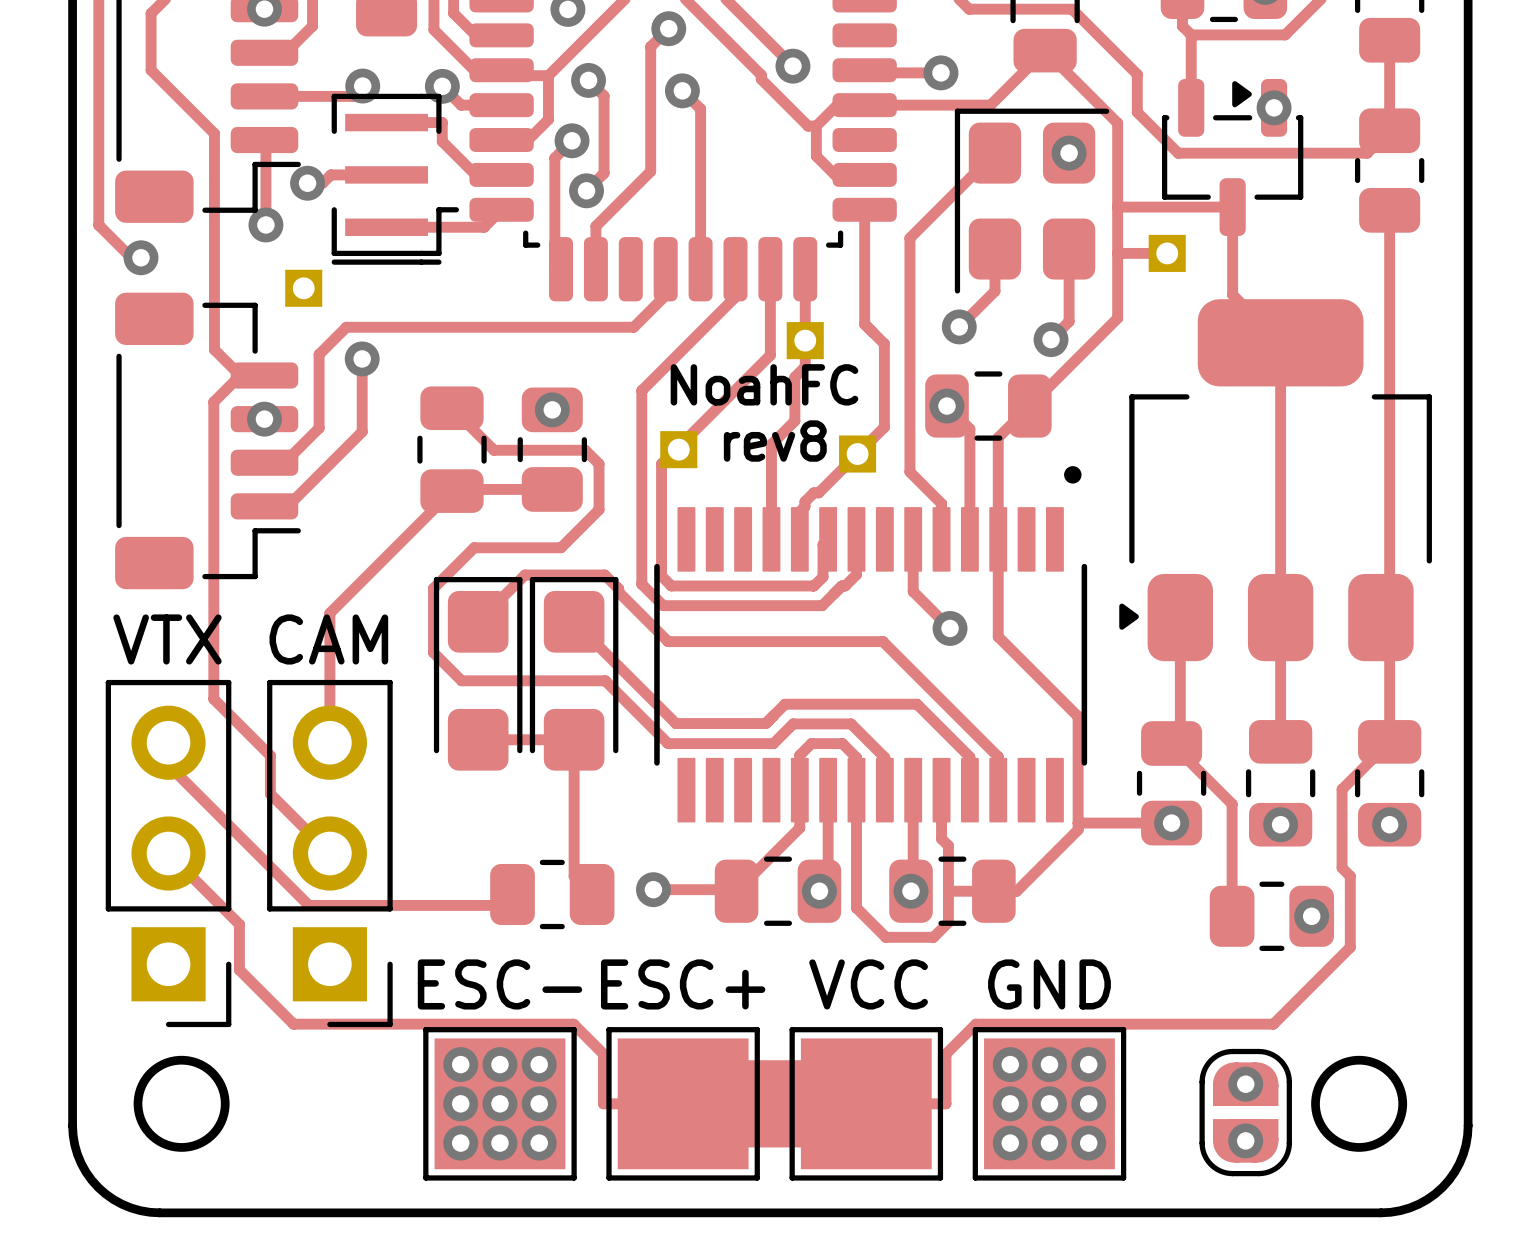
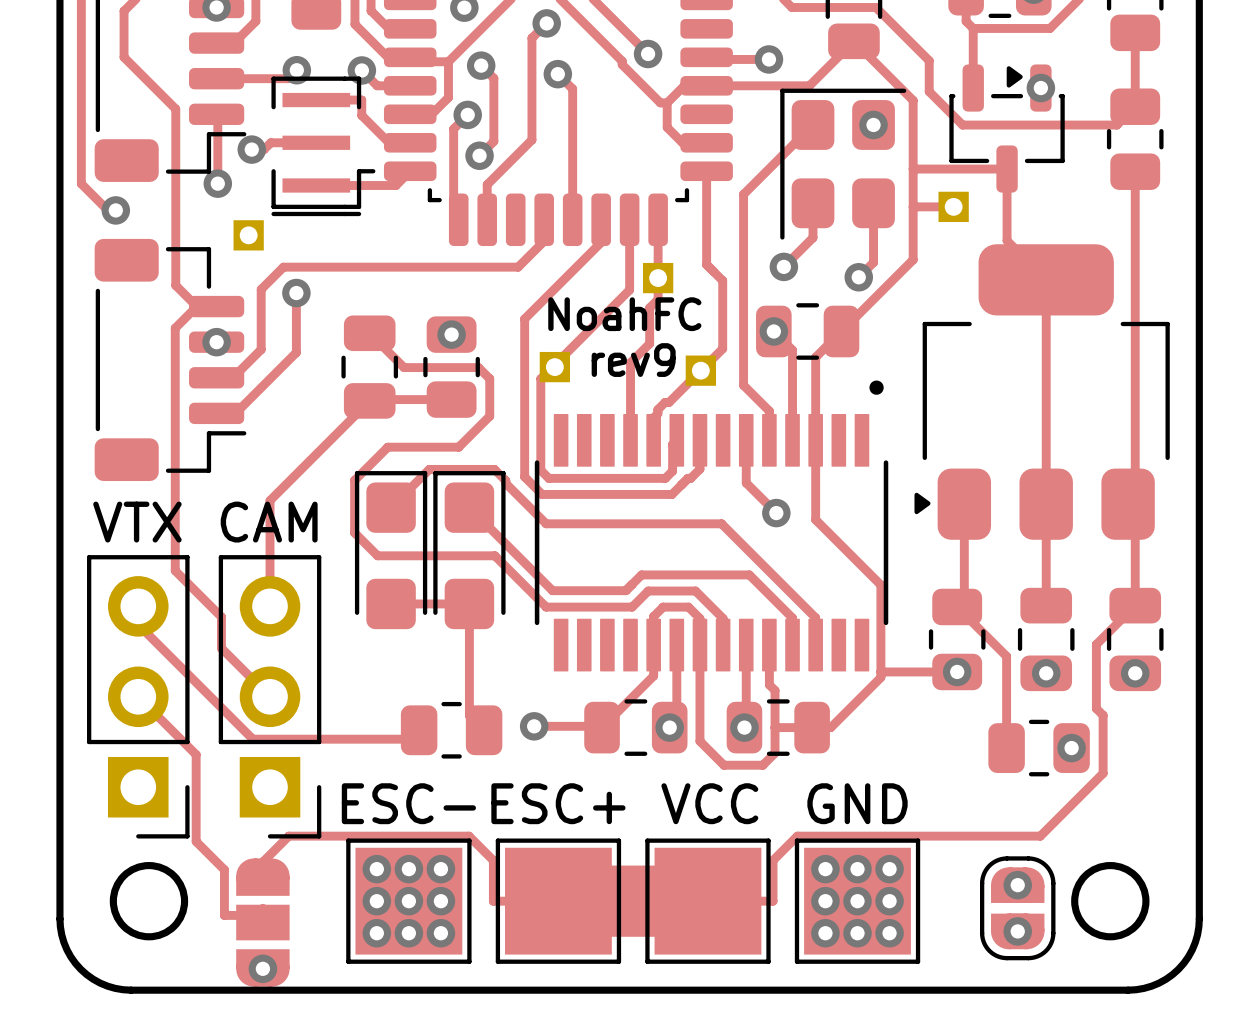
text: rev8 (775, 441) -> rev9 (633, 360)
track: (239, 969) (293, 1024) (352, 1024) -> (196, 791) (196, 841) (224, 869) (224, 915) (255, 915) (262, 908)
track: none -> (288, 836) (262, 862) (262, 876)
part: none -> (262, 922)
via: none -> (262, 968)

